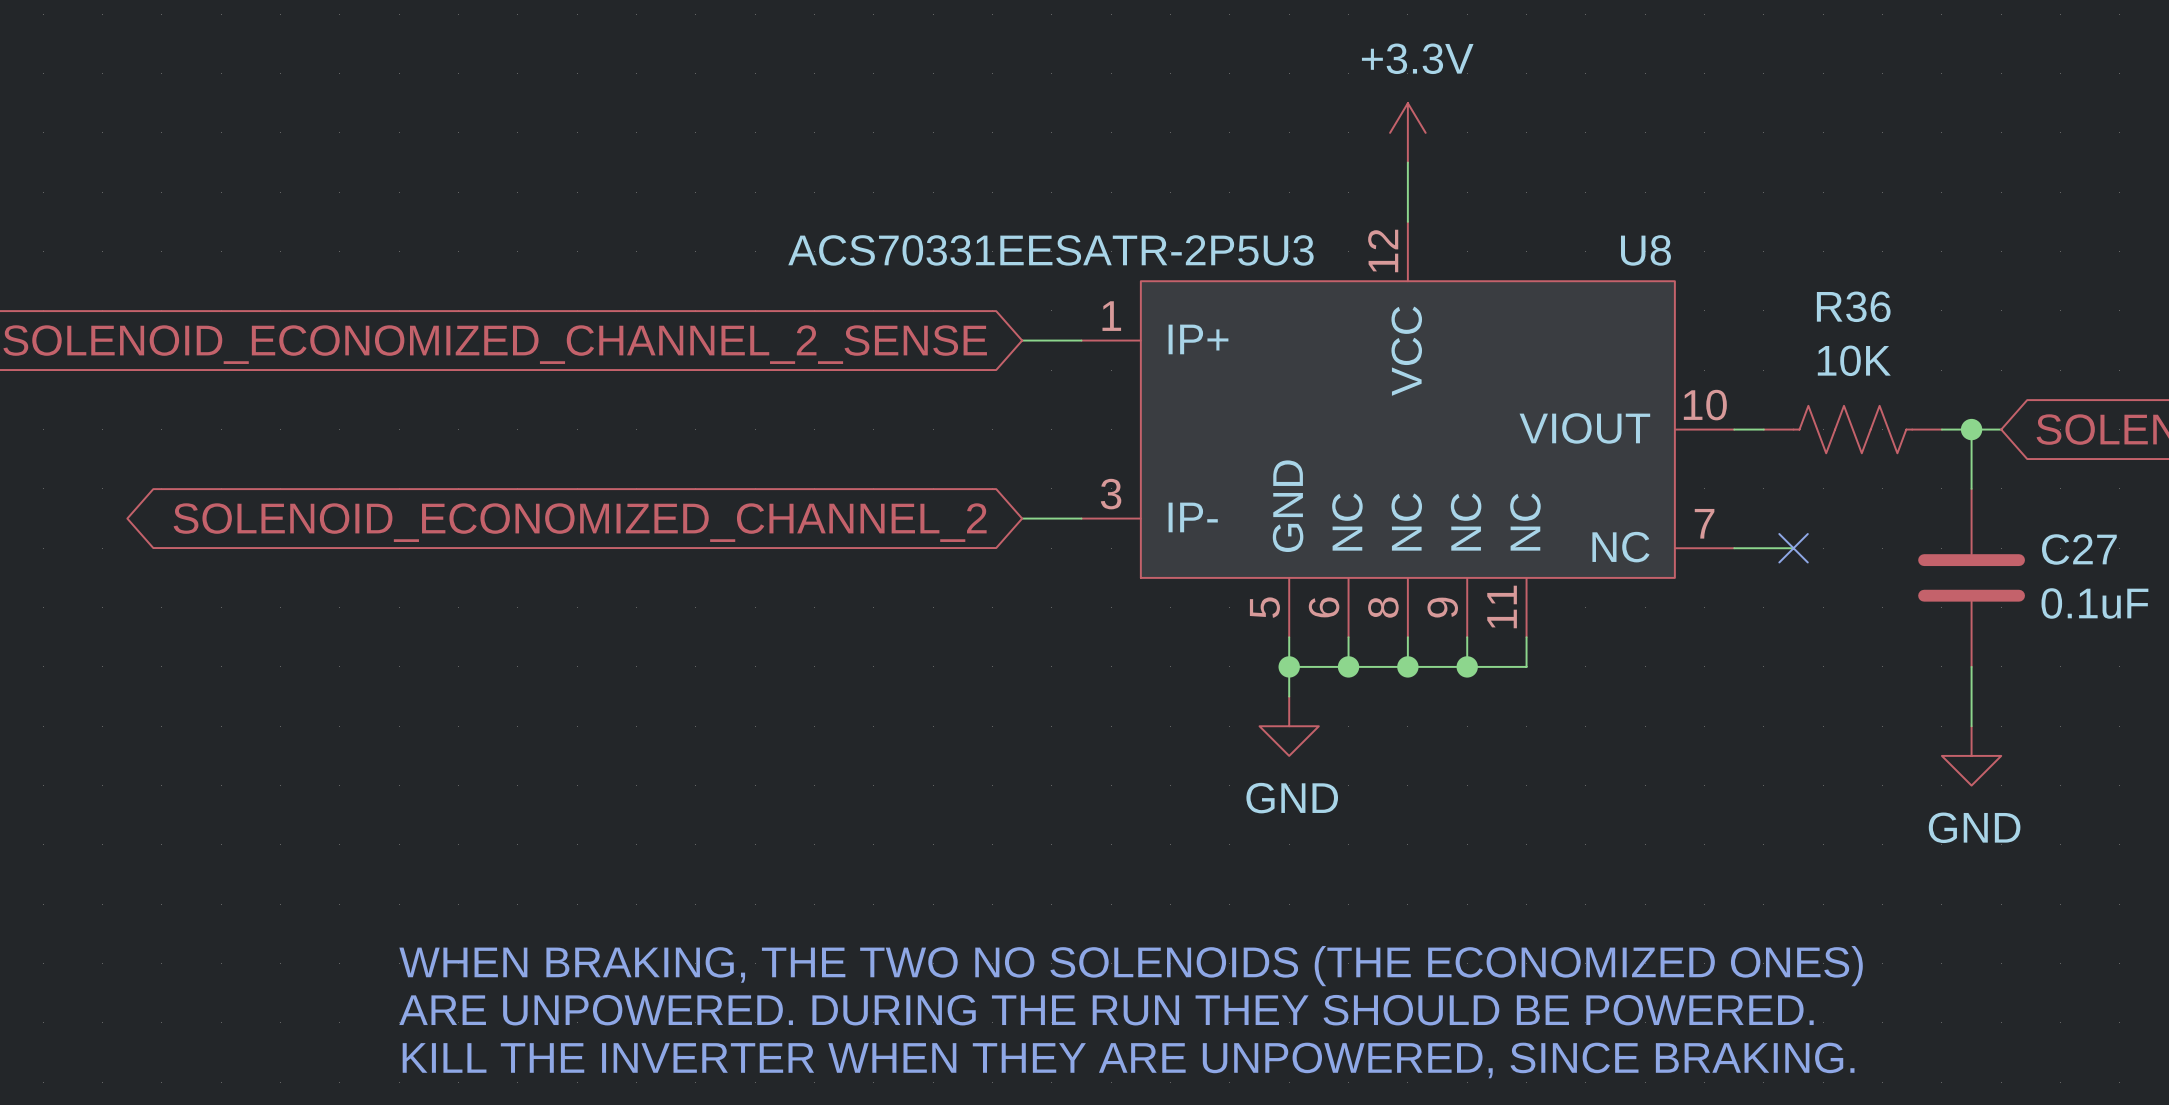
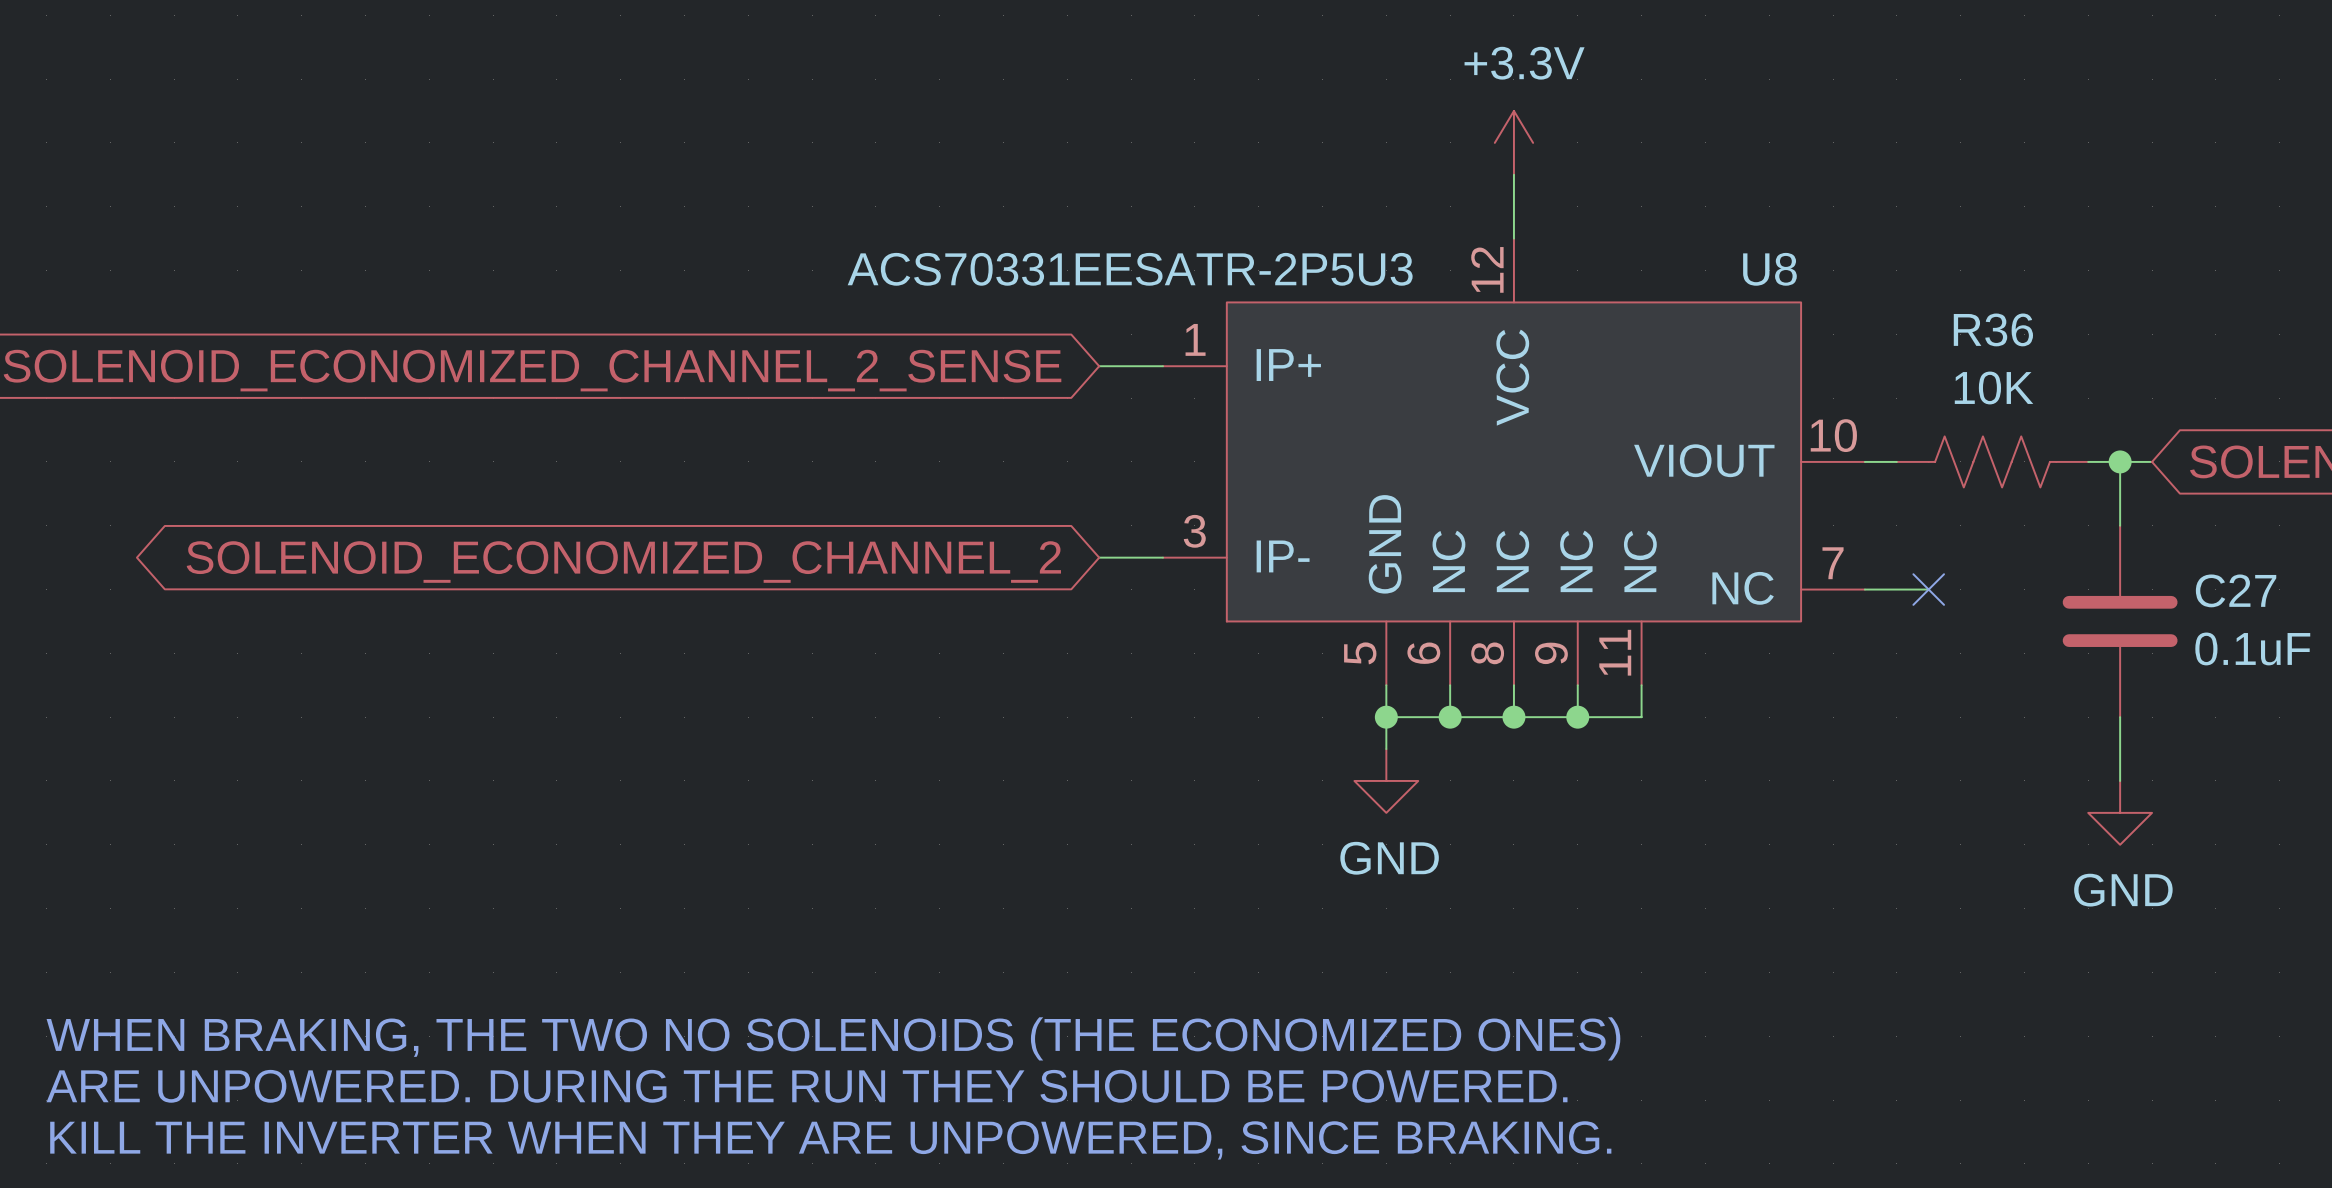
text position: WHEN BRAKING, THE TWO NO SOLENOIDS (THE ECONOMIZED ONES) (1131, 966) -> WHEN BRAKING, THE TWO NO SOLENOIDS (THE ECONOMIZED ONES) (833, 1038)
text position: ARE UNPOWERED. DURING THE RUN THEY SHOULD BE POWERED. (1106, 1010) -> ARE UNPOWERED. DURING THE RUN THEY SHOULD BE POWERED. (806, 1086)
text position: KILL THE INVERTER WHEN THEY ARE UNPOWERED, SINCE BRAKING. (1128, 1060) -> KILL THE INVERTER WHEN THEY ARE UNPOWERED, SINCE BRAKING. (830, 1140)

